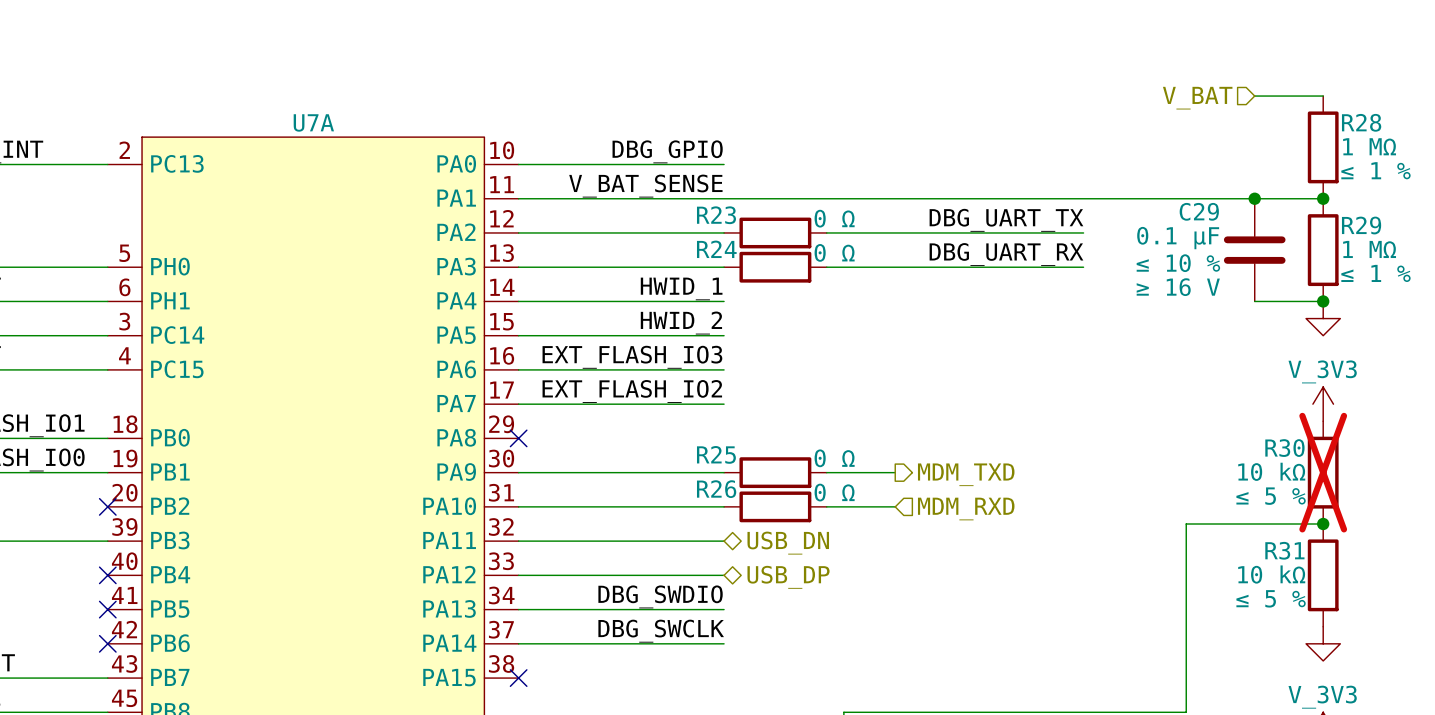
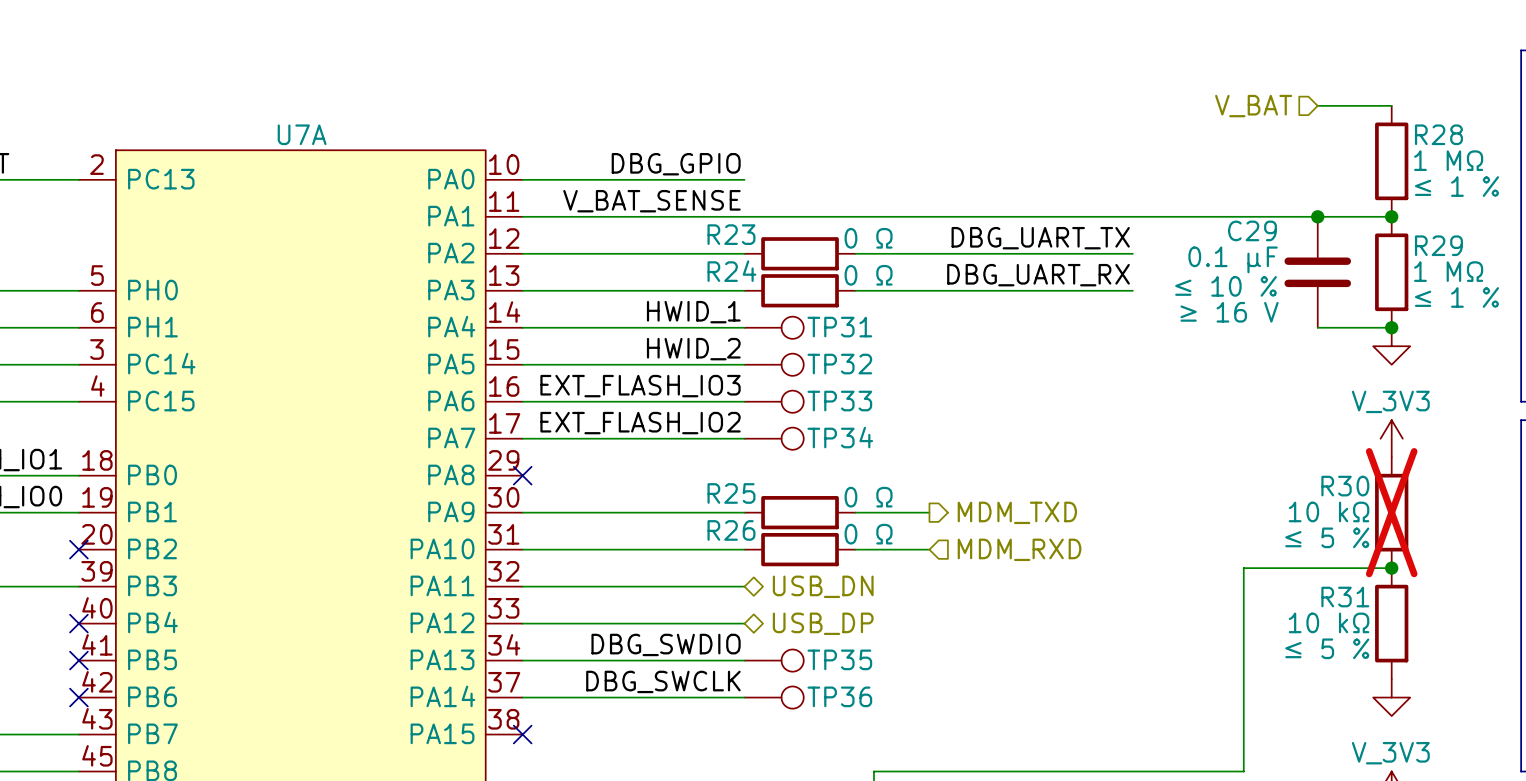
TP31: none -> (774, 327)
TP32: none -> (774, 364)
TP33: none -> (774, 401)
TP34: none -> (774, 438)
TP35: none -> (774, 660)
TP36: none -> (774, 697)

